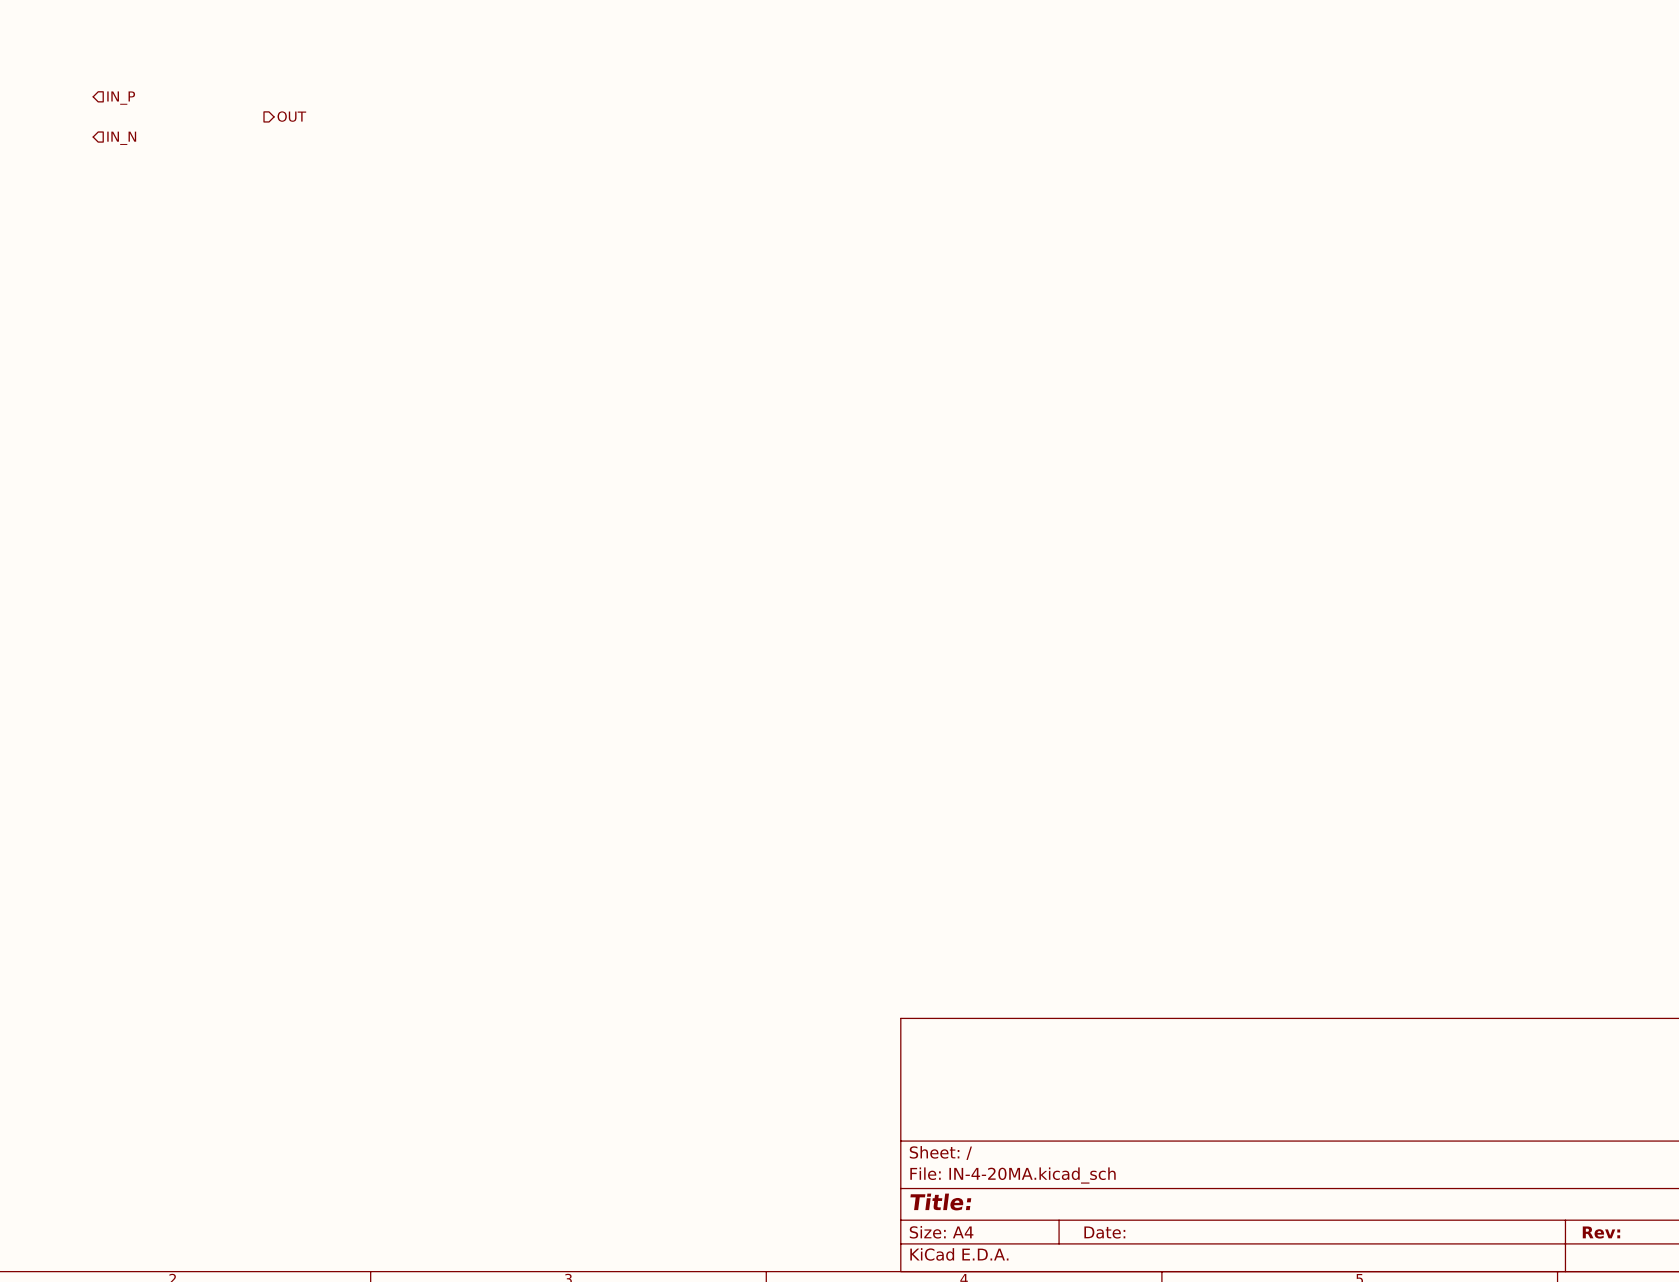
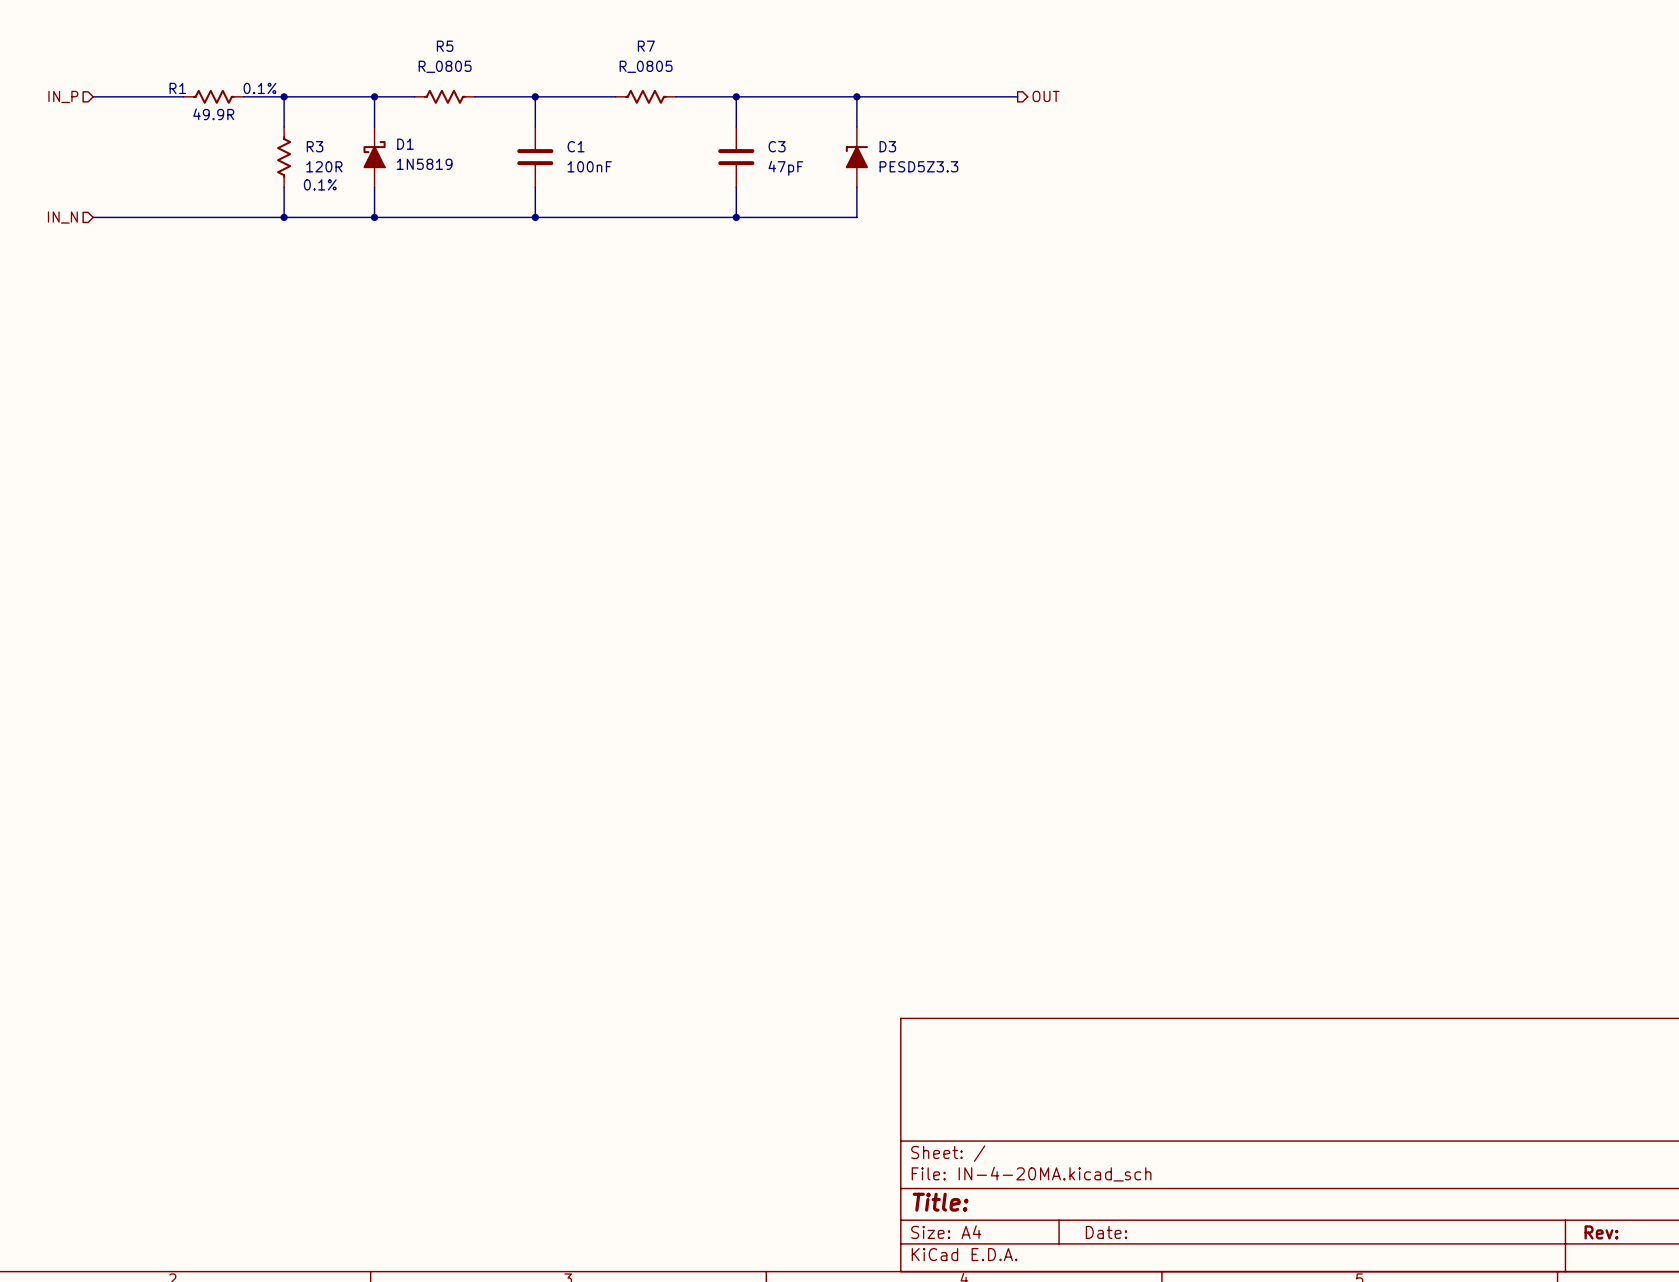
wire: none -> (93, 96) (183, 96)
R1: none -> 49.9R (213, 96)
wire: none -> (243, 96) (414, 96)
wire: none -> (284, 96) (284, 126)
junction: none -> (284, 96)
wire: none -> (374, 96) (374, 126)
junction: none -> (374, 96)
R5: none -> R_0805 (444, 96)
wire: none -> (475, 96) (615, 96)
wire: none -> (535, 96) (535, 126)
junction: none -> (535, 96)
R7: none -> R_0805 (645, 96)
wire: none -> (676, 96) (1017, 96)
wire: none -> (736, 96) (736, 126)
junction: none -> (736, 96)
wire: none -> (856, 96) (856, 126)
junction: none -> (856, 96)
hierarchical label: none -> OUT (1046, 96)
hierarchical label rotation: 0° (121, 98) -> 180° (63, 96)
hierarchical label position: IN_P (121, 98) -> IN_P (63, 96)
hierarchical label: OUT (291, 116) -> none
hierarchical label rotation: 0° (121, 138) -> 180° (62, 217)
hierarchical label position: IN_N (121, 138) -> IN_N (62, 217)
R3: none -> 120R (284, 157)
D1: none -> 1N5819 (374, 157)
C1: none -> 100nF (535, 157)
C3: none -> 47pF (736, 157)
D3: none -> PESD5Z3.3 (856, 157)
wire: none -> (284, 187) (284, 217)
wire: none -> (374, 187) (374, 217)
wire: none -> (535, 187) (535, 217)
wire: none -> (736, 187) (736, 217)
wire: none -> (856, 187) (856, 217) (93, 217)
junction: none -> (284, 217)
junction: none -> (374, 217)
junction: none -> (535, 217)
junction: none -> (736, 217)

